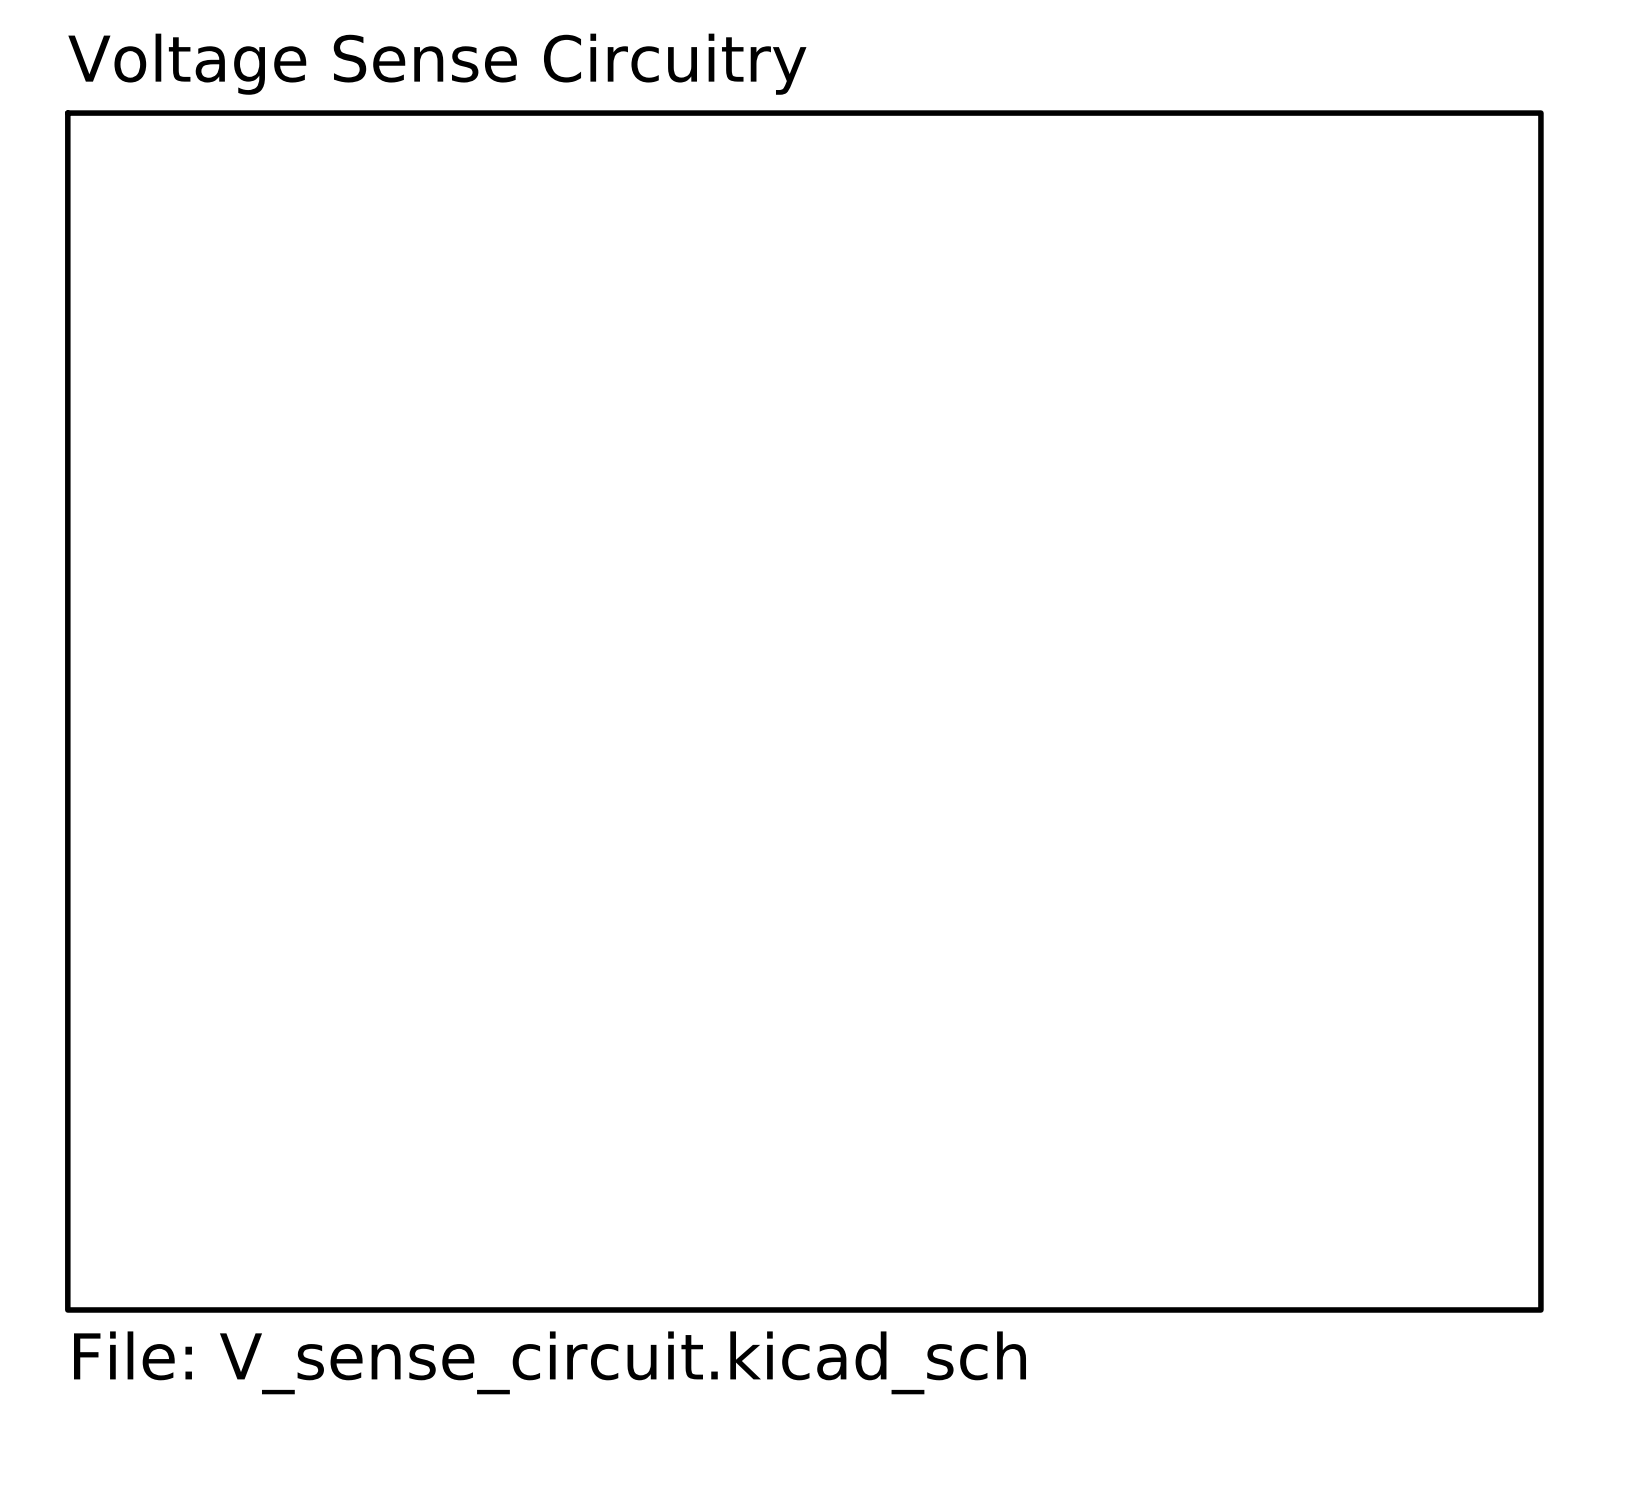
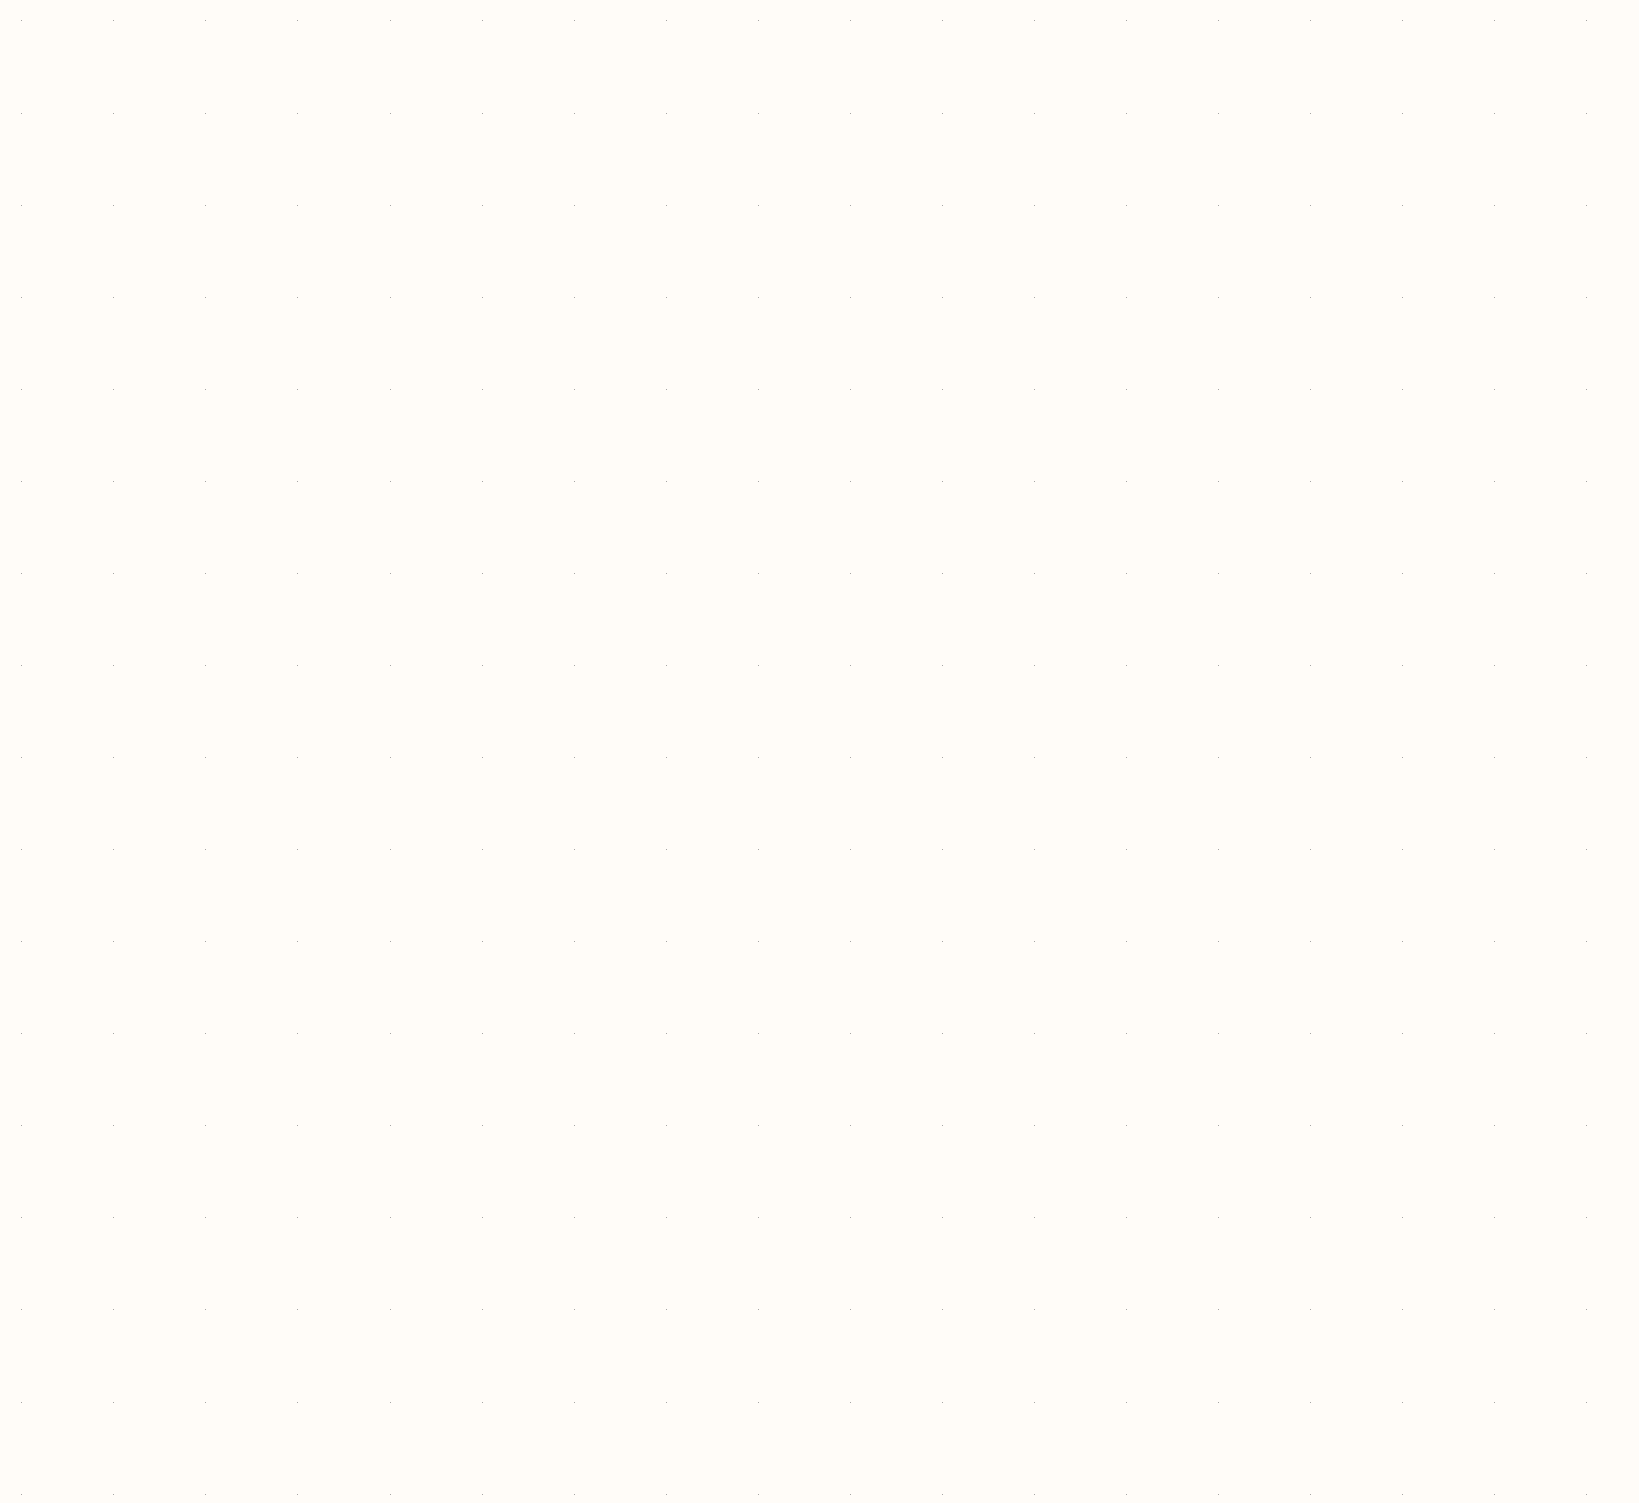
sheet Voltage Sense Circuitry: File: V_sense_circuit.kicad_sch (804, 711) -> none

